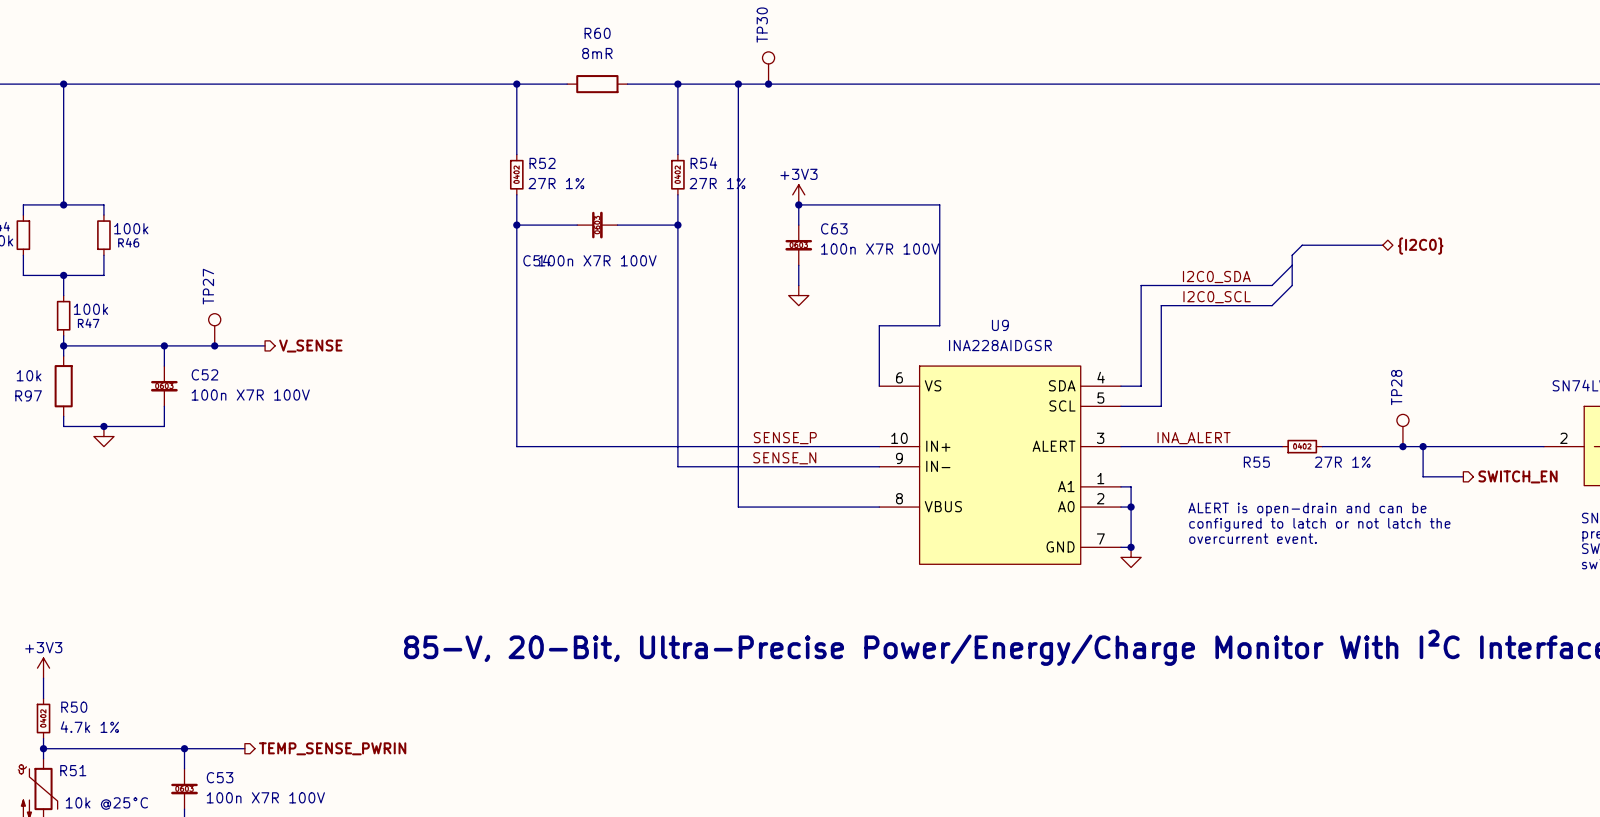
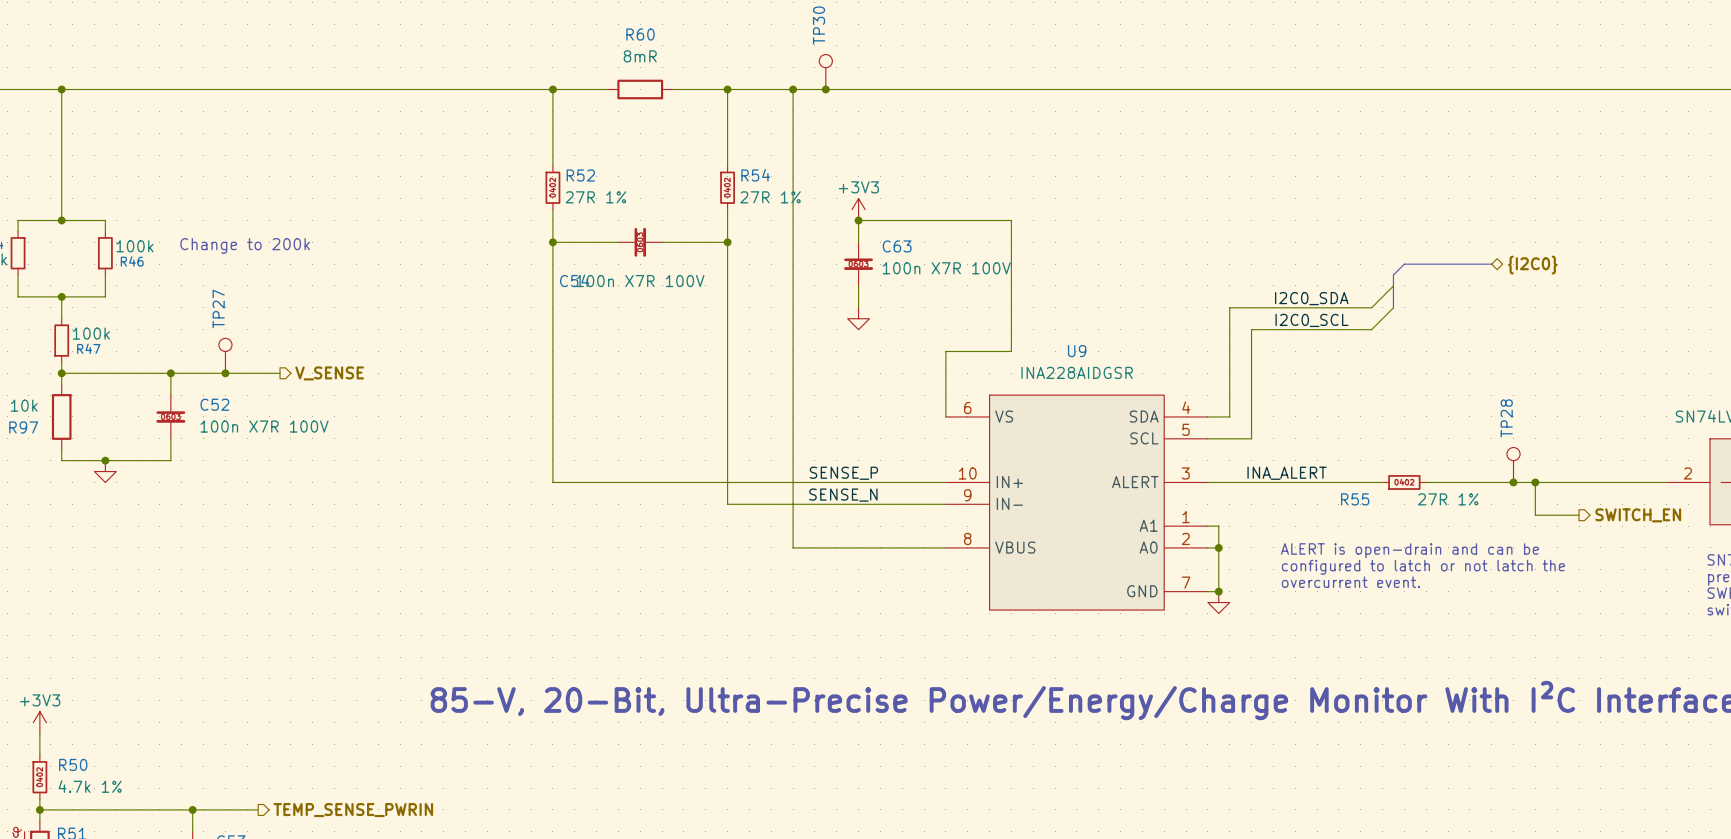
text: none -> Change to 200k (245, 245)

